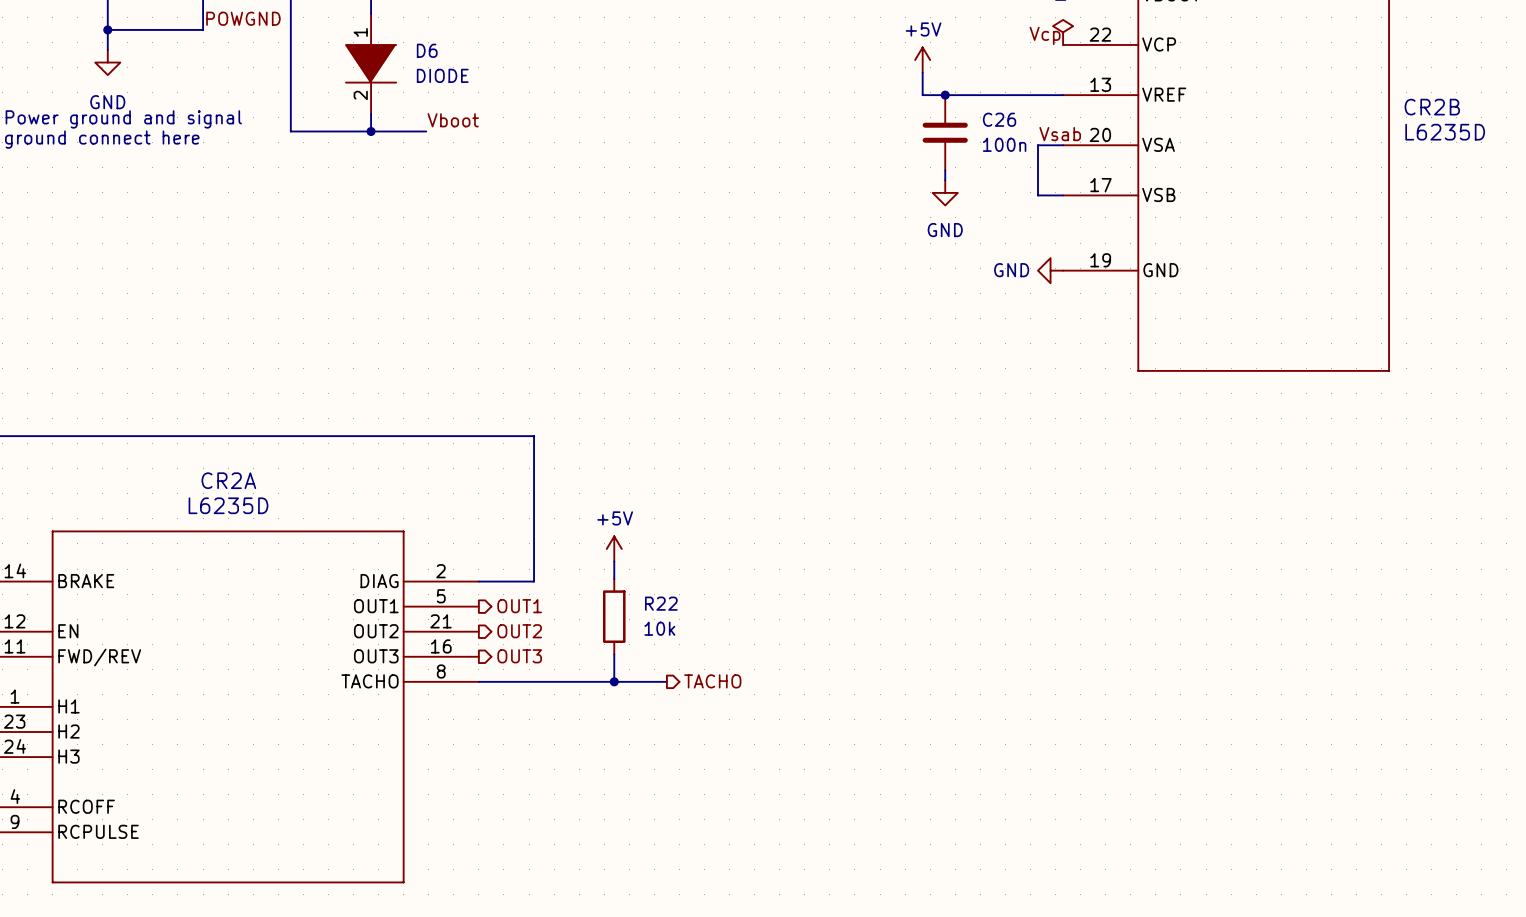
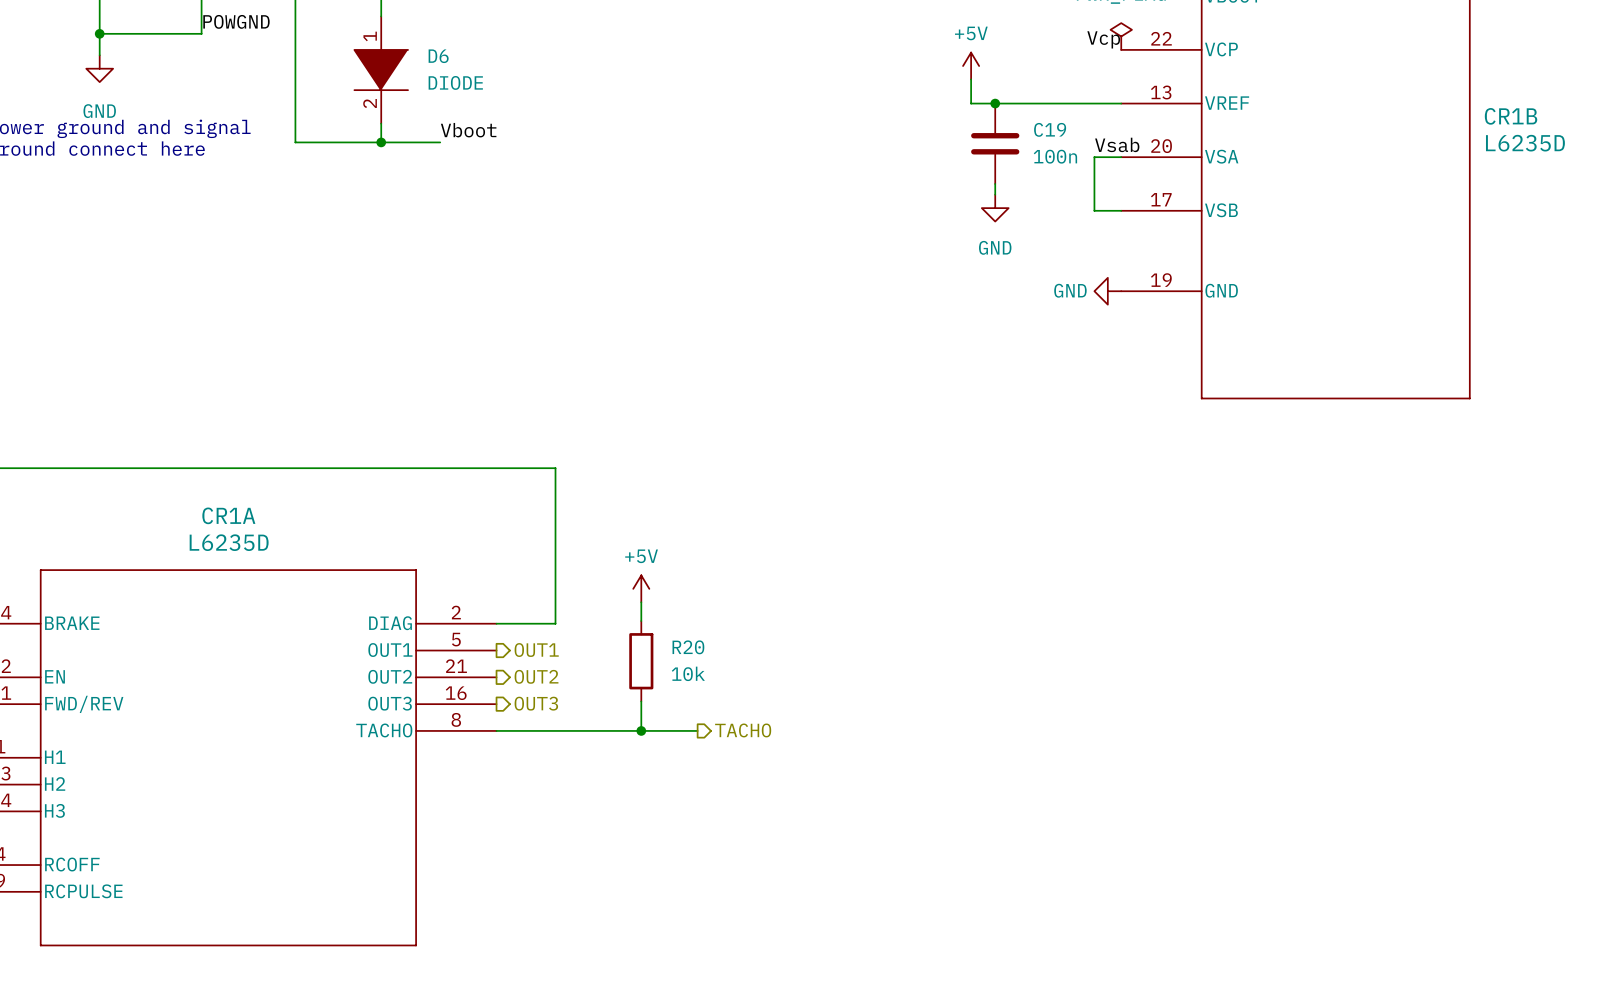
CR2B name: CR2B (1432, 107) -> CR1B (1511, 116)
C26 name: C26 (999, 119) -> C19 (1050, 129)
CR2A name: CR2A (228, 480) -> CR1A (228, 515)
R22 name: R22 (661, 603) -> R20 (688, 647)

